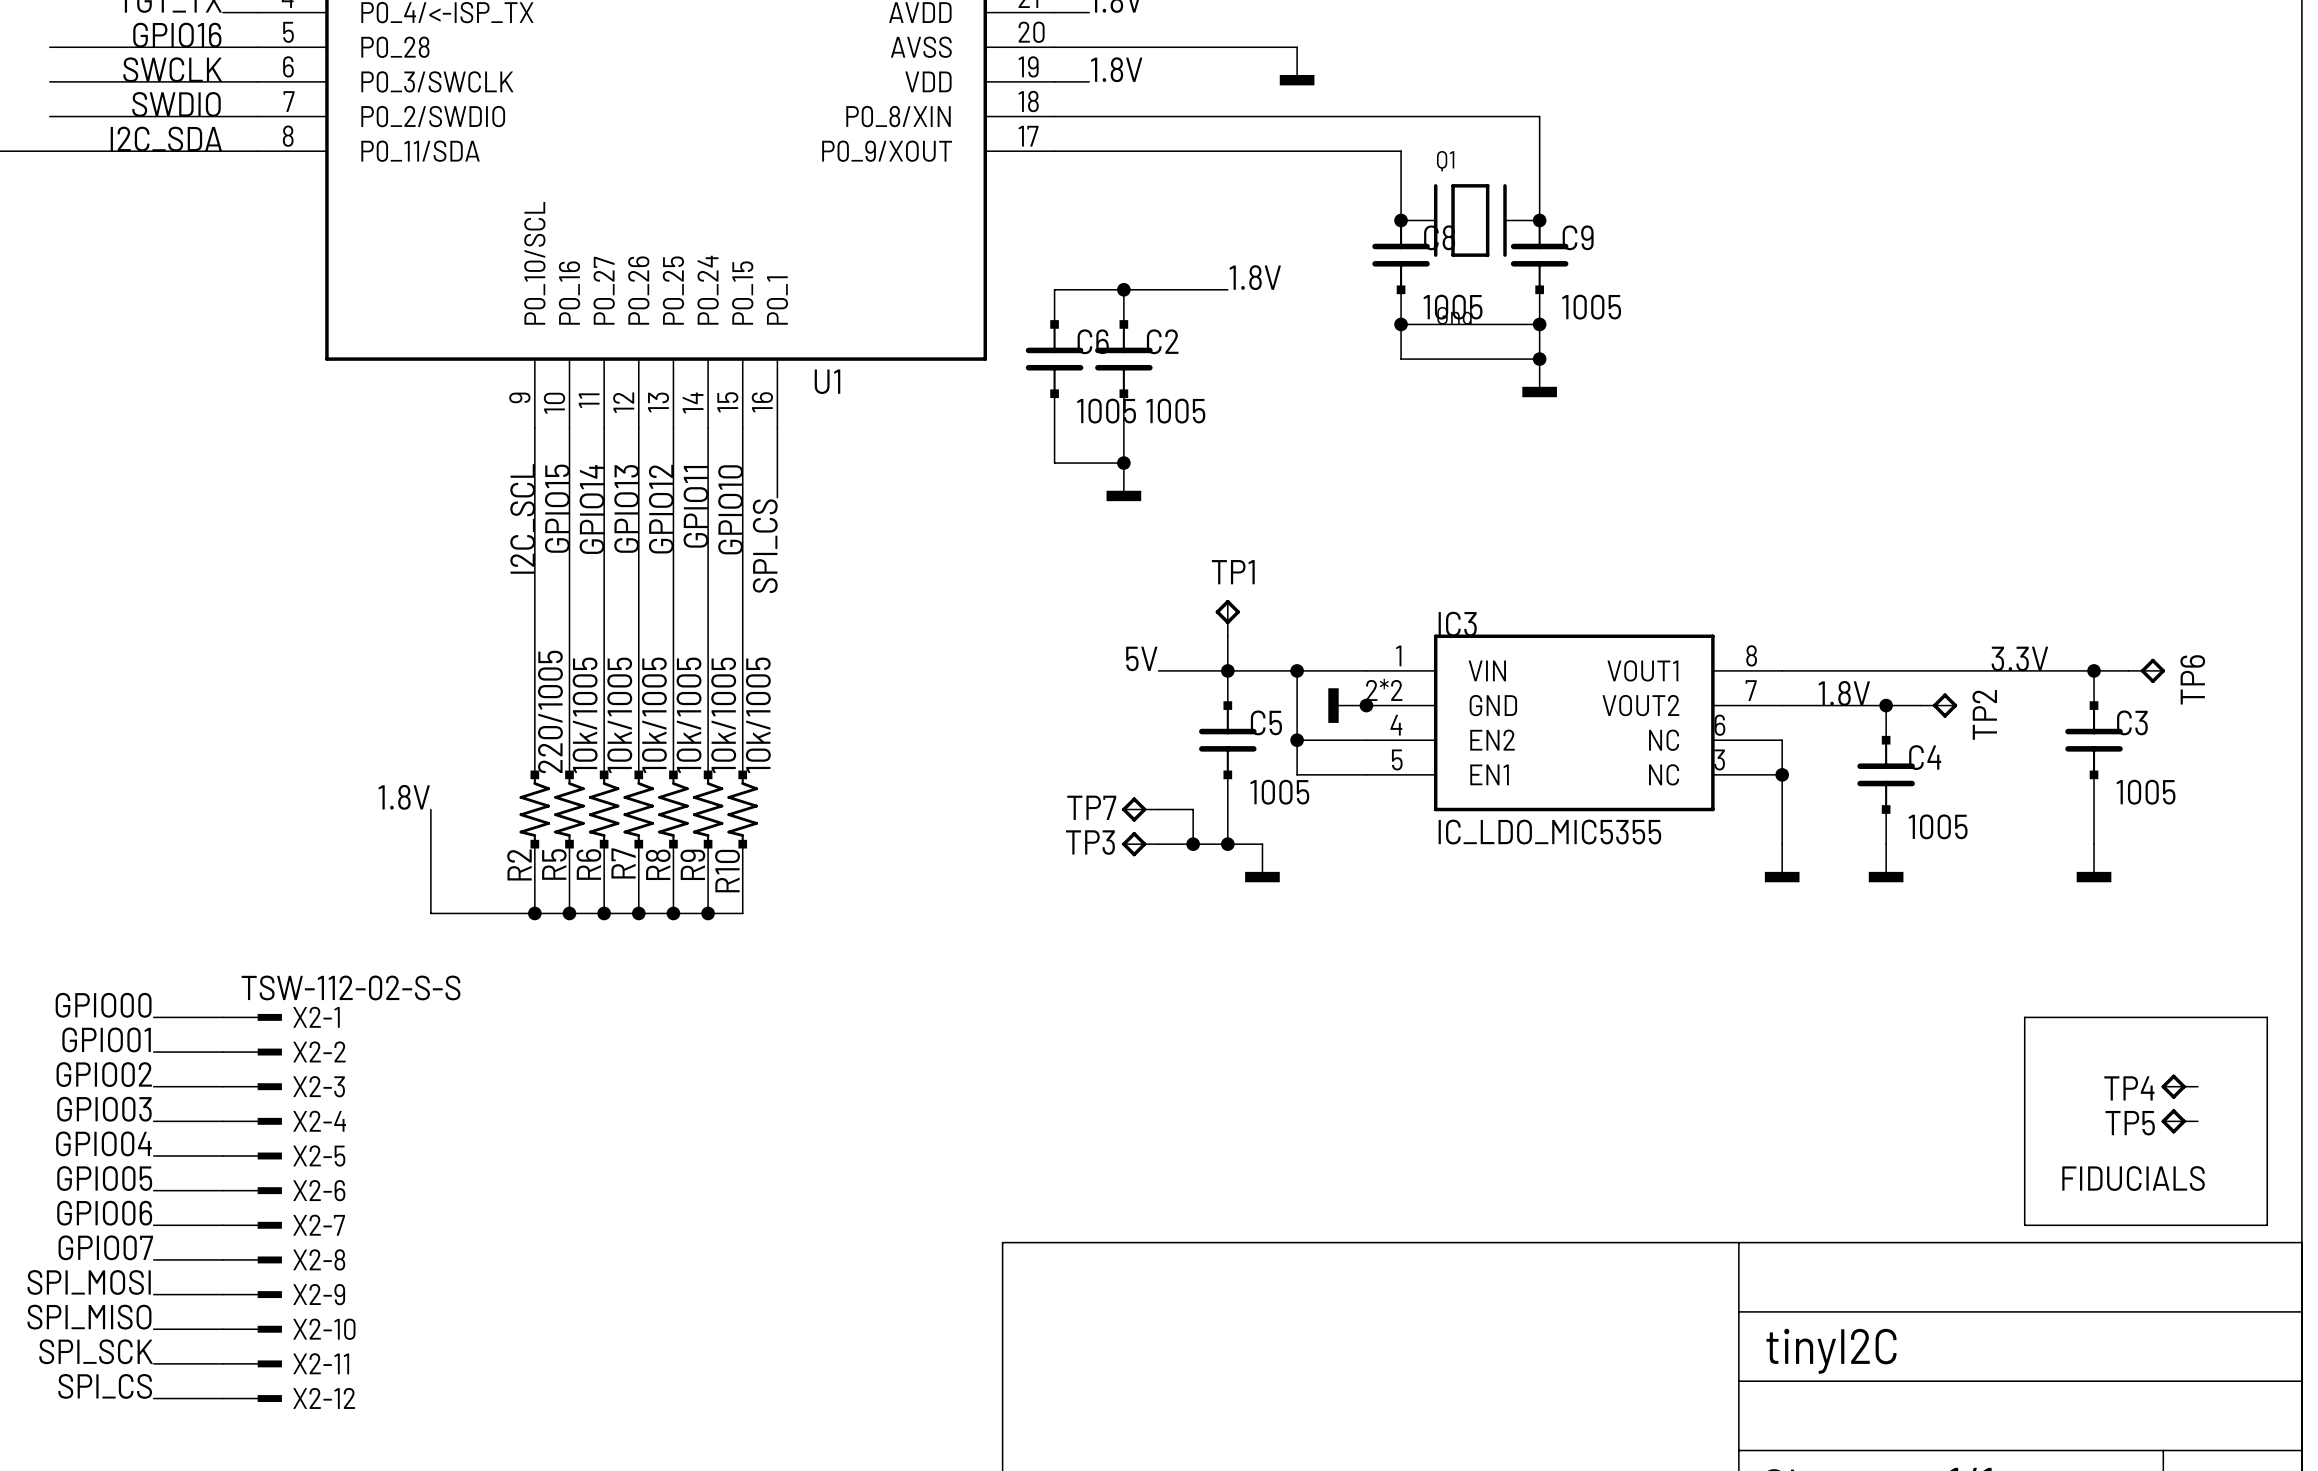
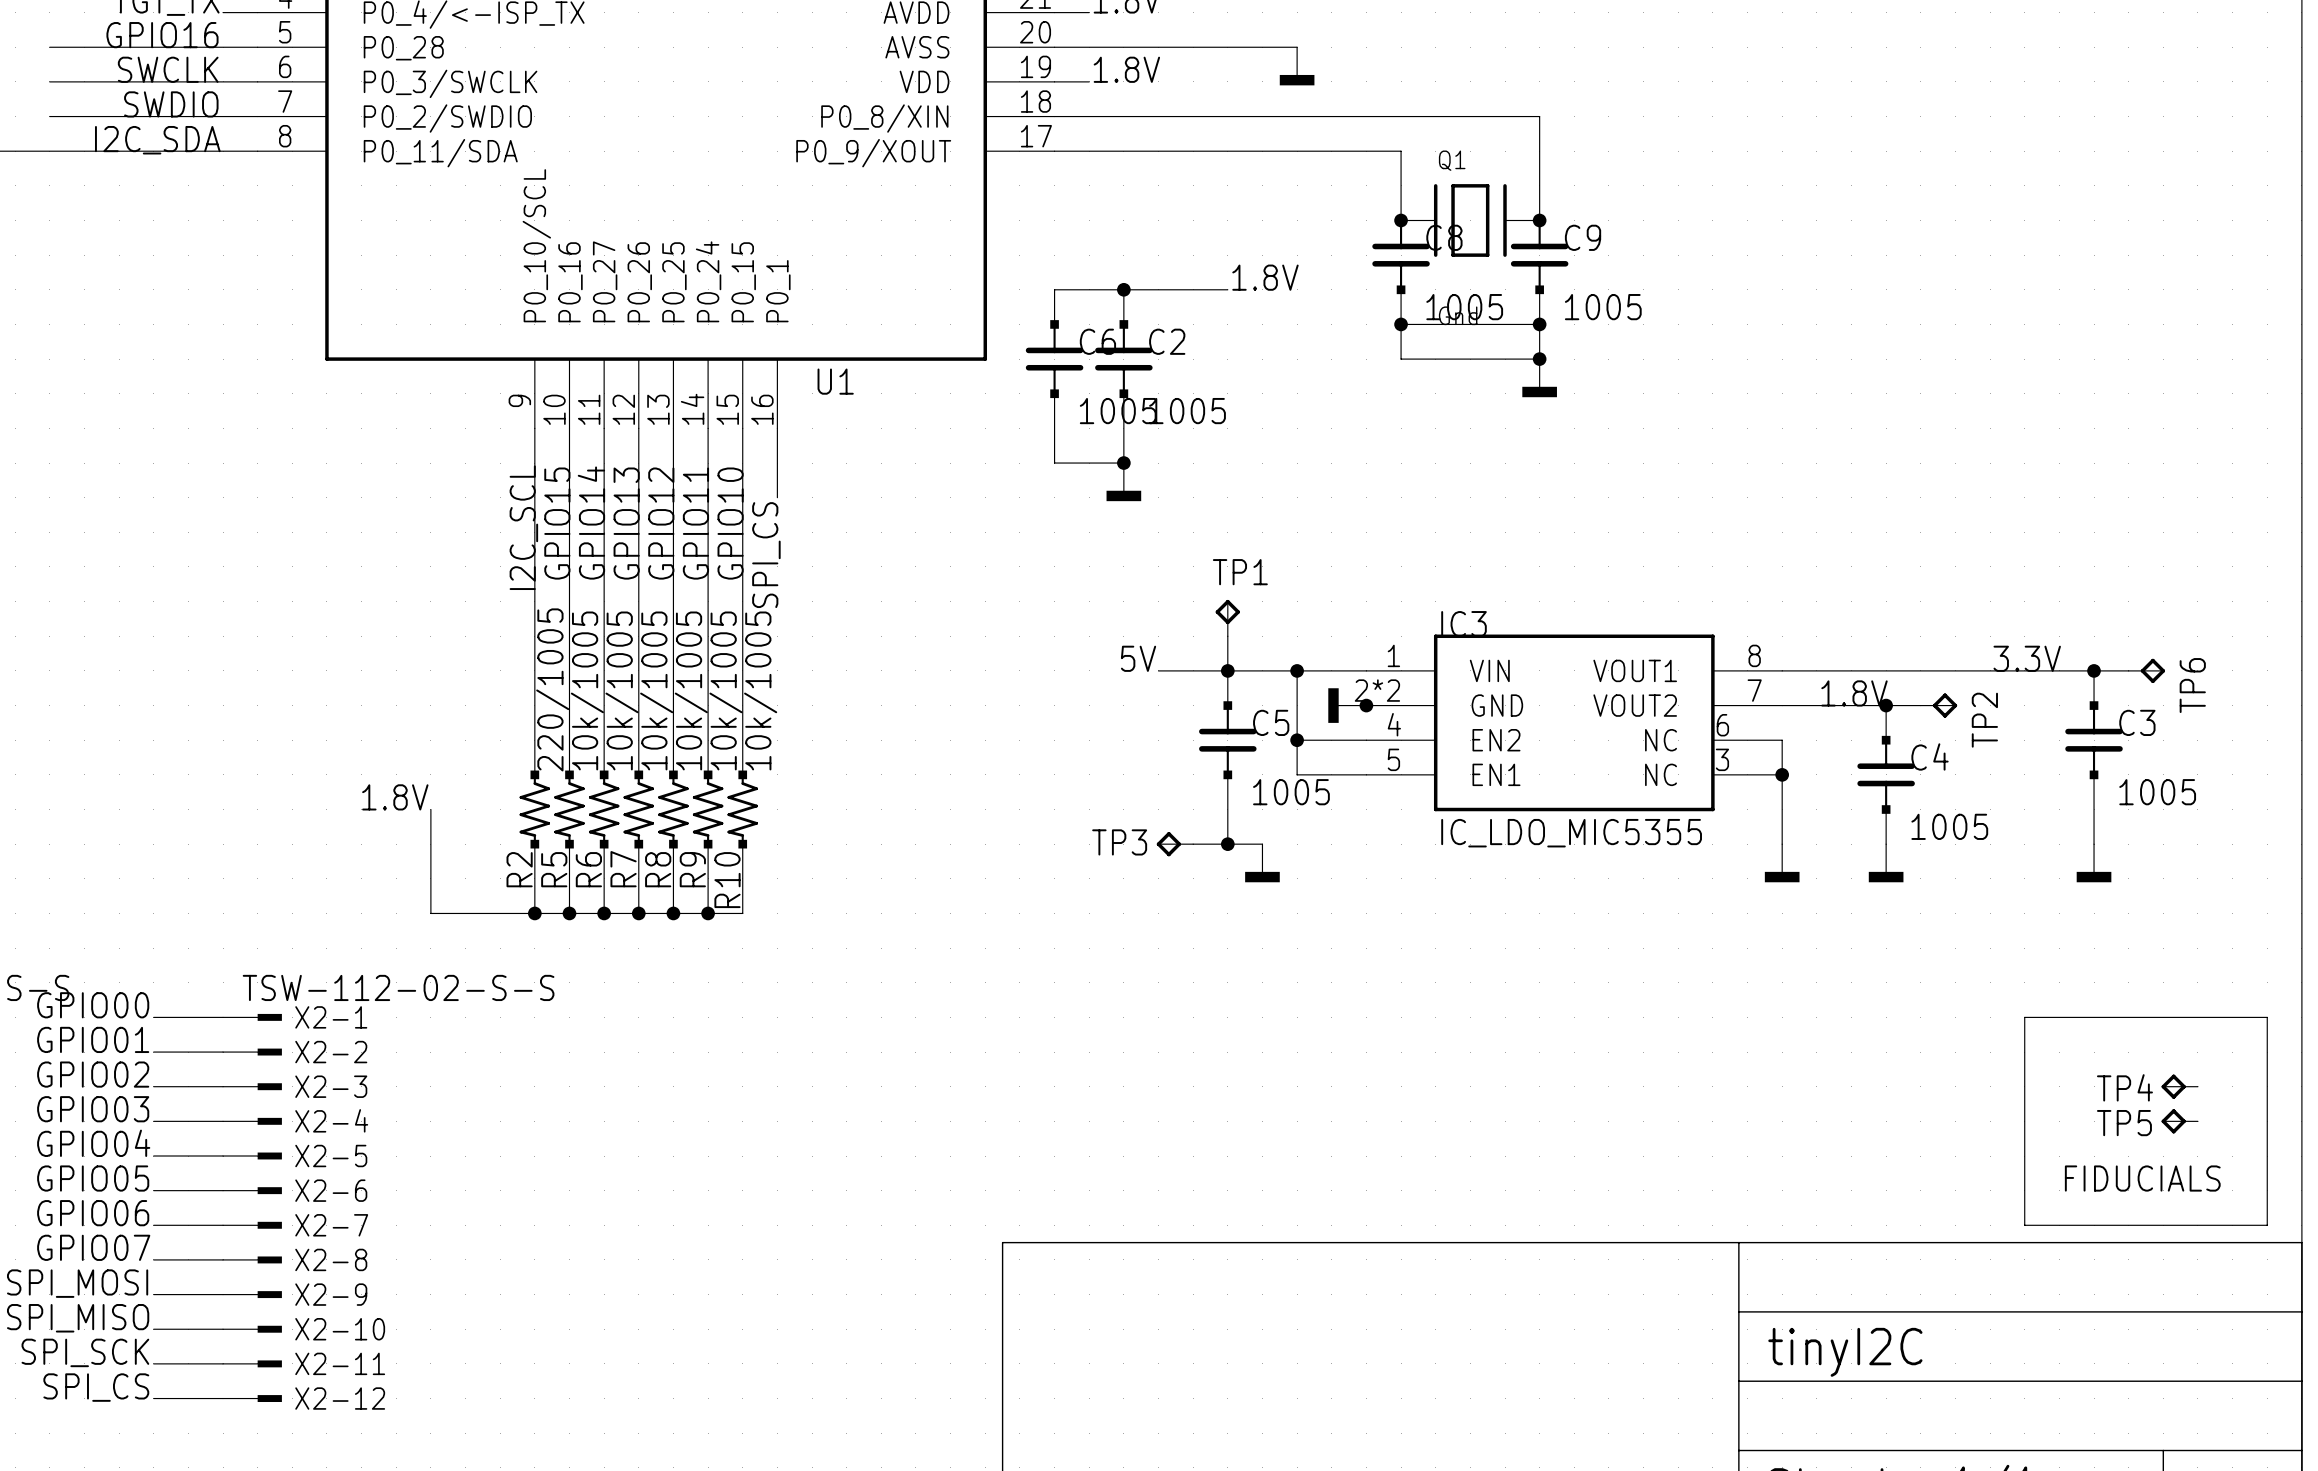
TP7: (1140, 809) -> none
wire: (1158, 809) (1193, 809) (1193, 844) (1158, 844) -> none
TP3 position: (1140, 844) -> (1174, 844)
junction: (1193, 844) -> none

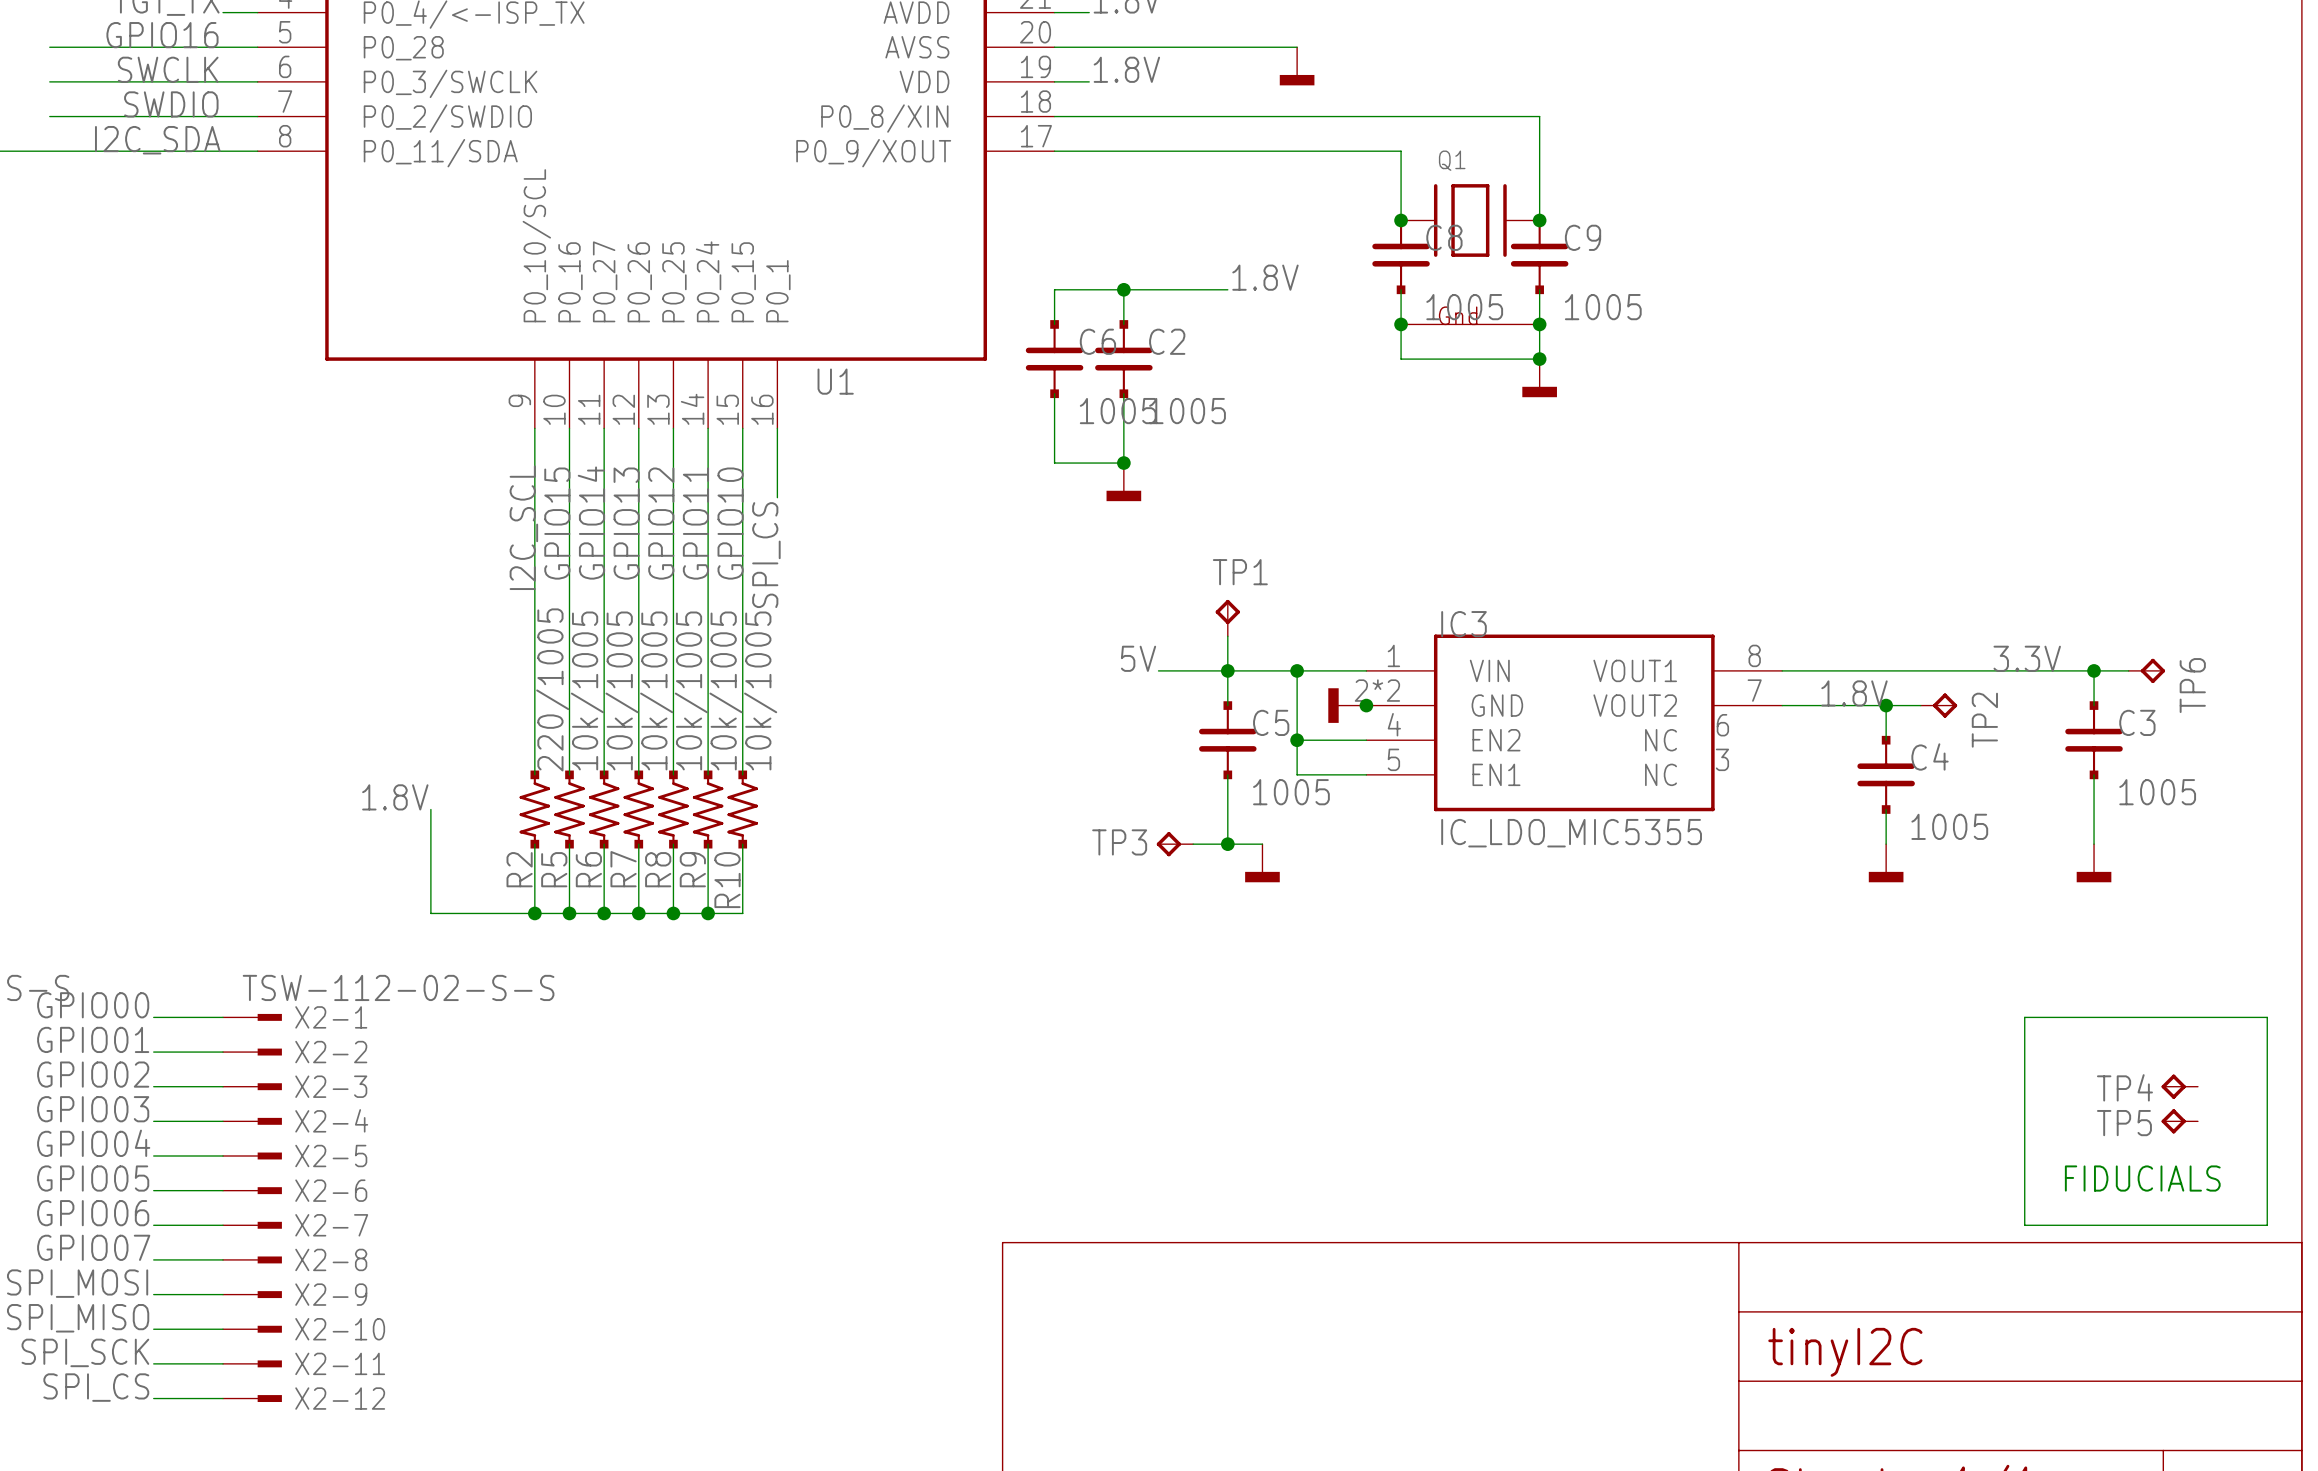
wire: (1712, 740) (1782, 740) (1782, 844) -> none
wire: (1712, 774) (1782, 774) -> none
junction: (1782, 774) -> none
power symbol: (1782, 863) -> none

